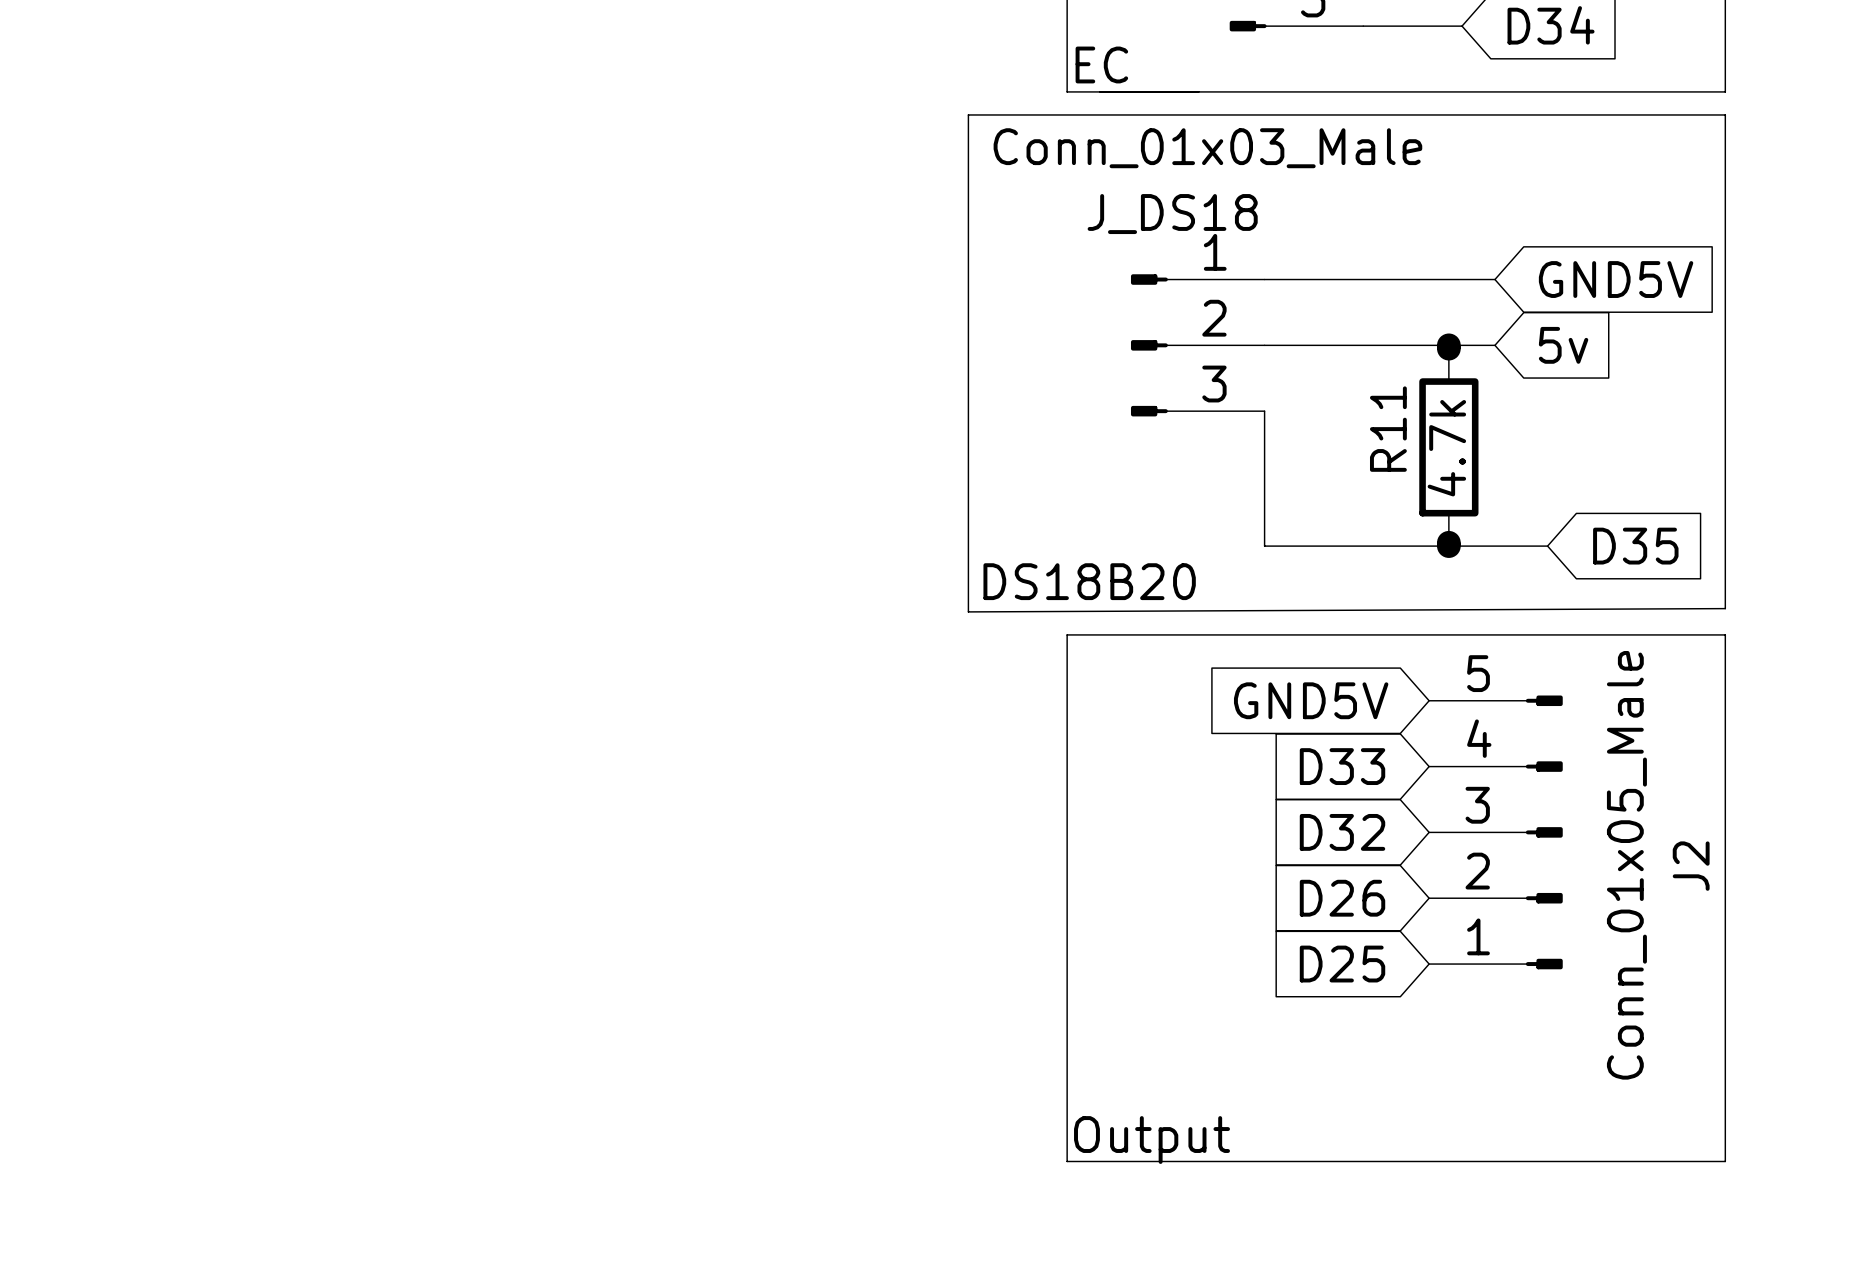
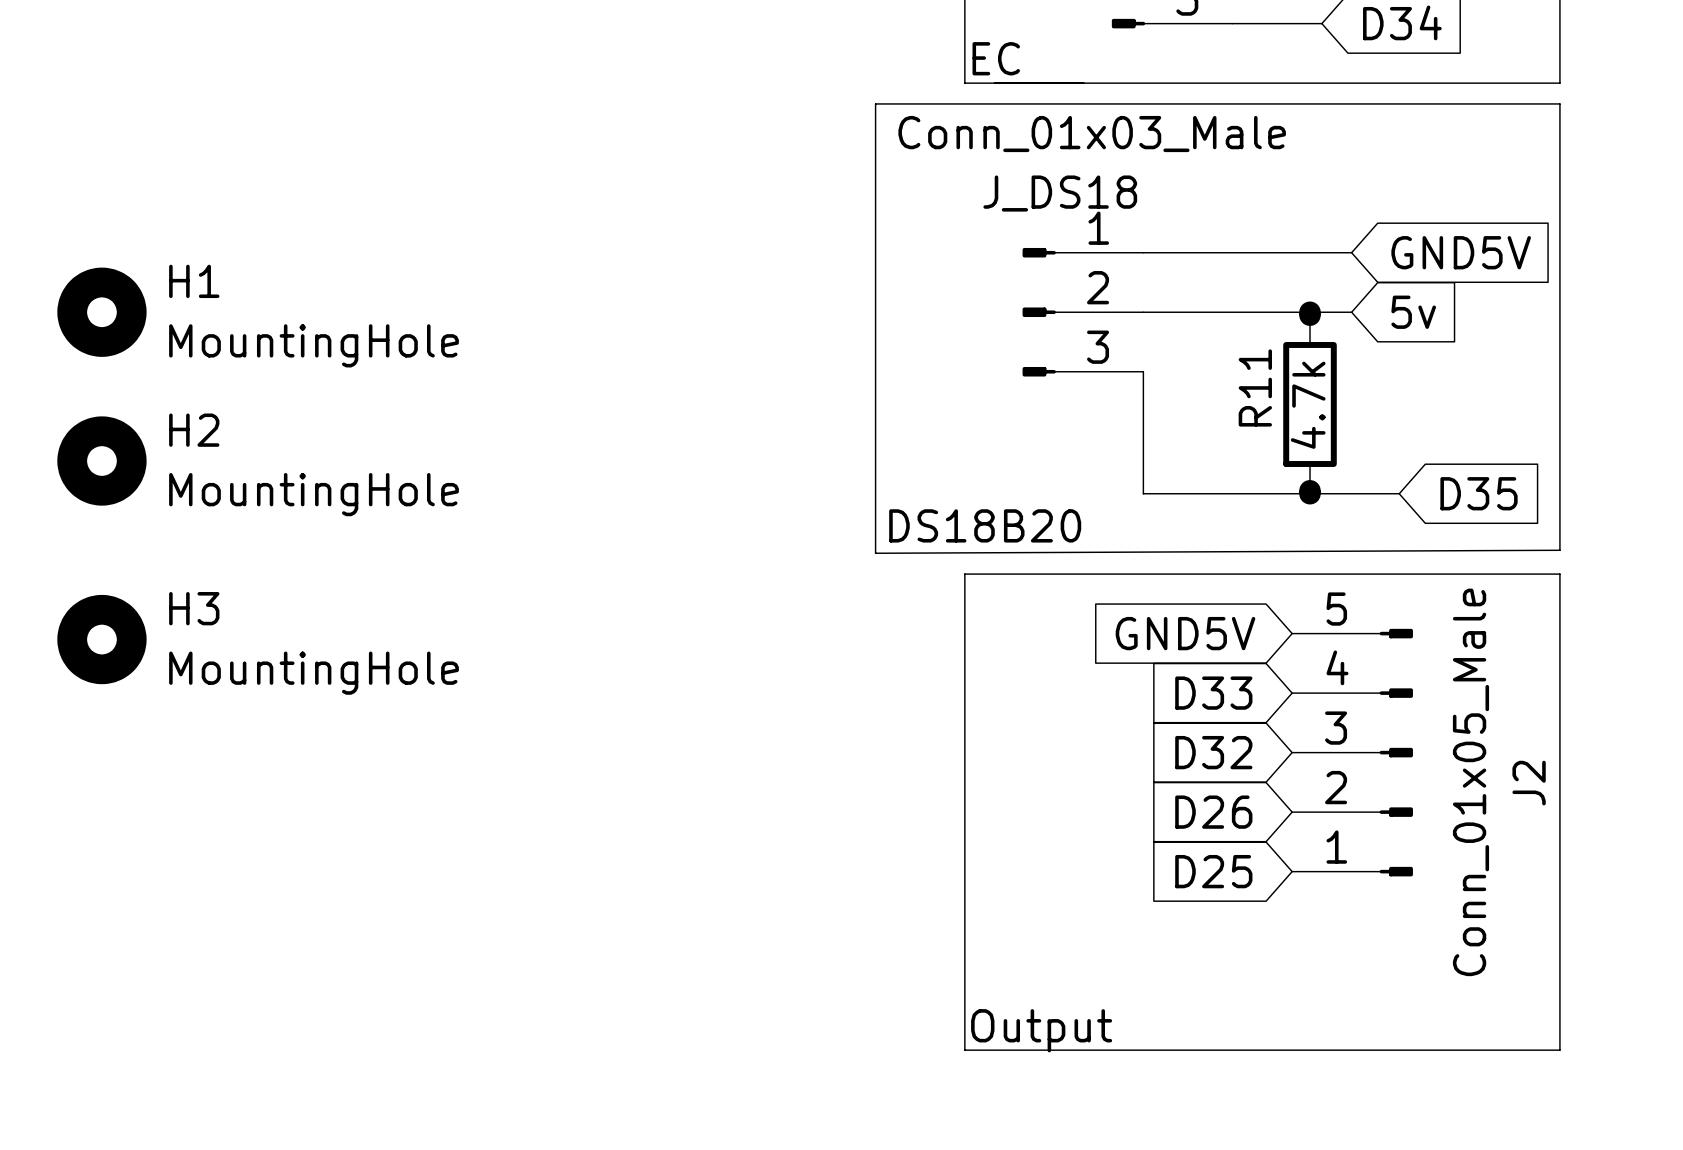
H1: none -> MountingHole (101, 312)
H2: none -> MountingHole (101, 461)
H3: none -> MountingHole (101, 639)

